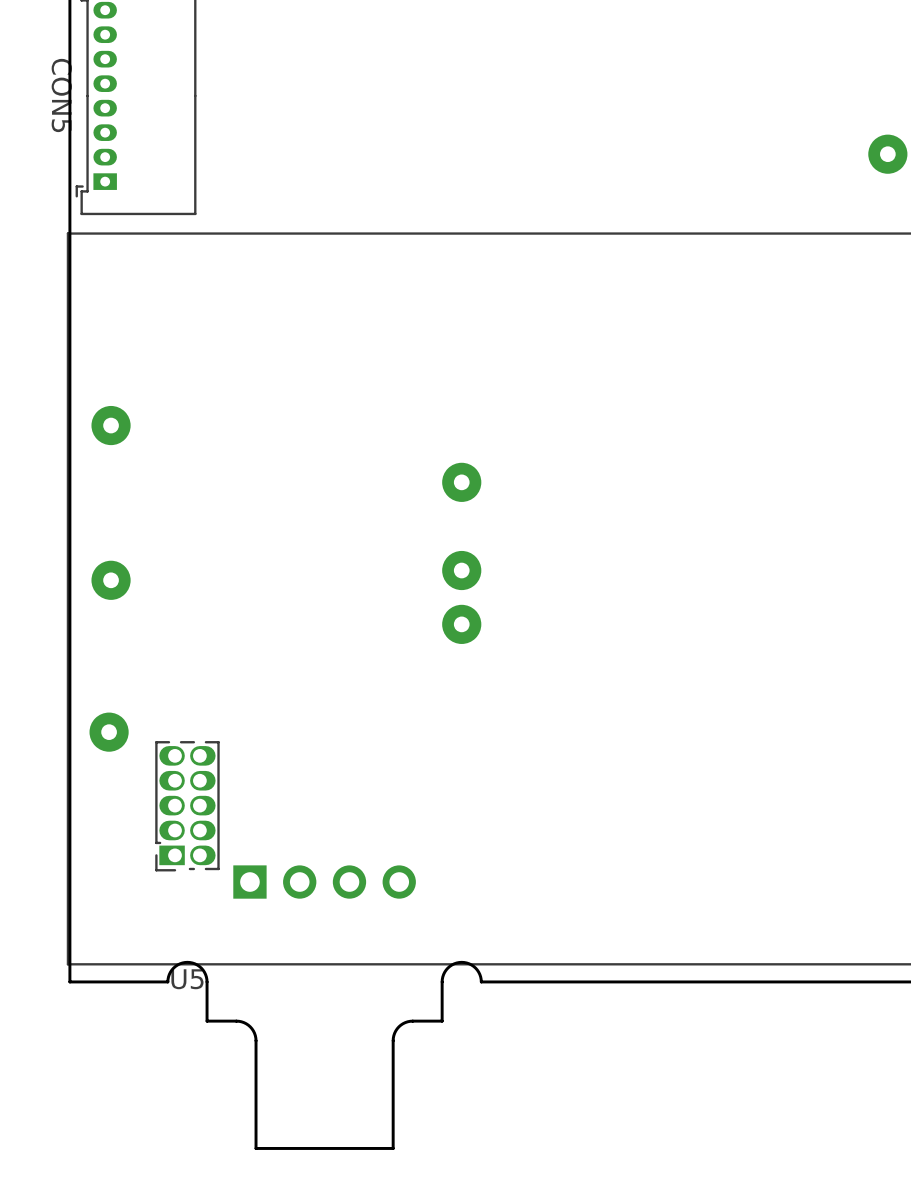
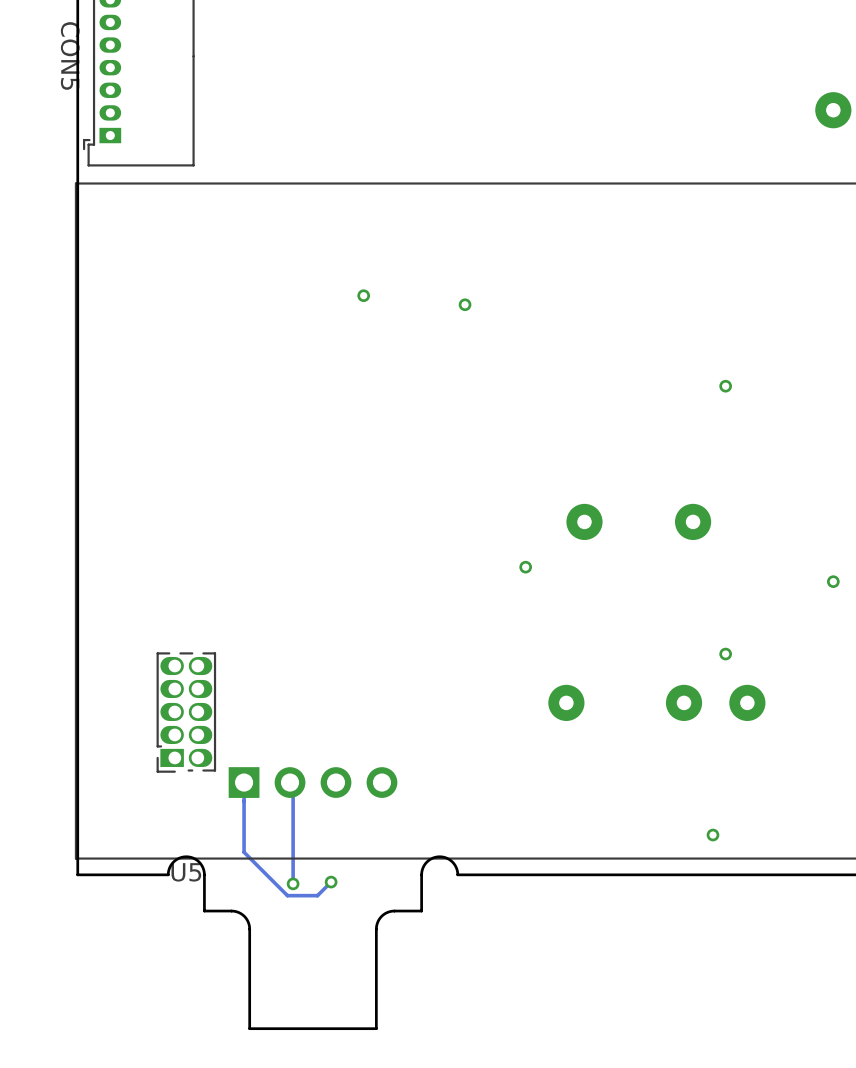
via: none -> (363, 295)
via: none -> (465, 304)
part: (111, 425) -> none
via: none -> (725, 386)
part: (461, 482) -> none
part: (461, 570) -> none
part: (111, 580) -> none
part: none -> (584, 521)
part: none -> (693, 521)
part: (461, 624) -> none
via: none -> (525, 567)
via: none -> (833, 581)
part: (109, 732) -> none
via: none -> (725, 654)
part: none -> (566, 702)
part: none -> (684, 702)
part: none -> (747, 702)
track: none -> (244, 782) (244, 852) (287, 895) (317, 895) (331, 882)
track: none -> (290, 782) (293, 785) (293, 883)
via: none -> (712, 835)
via: none -> (331, 882)
via: none -> (293, 883)

